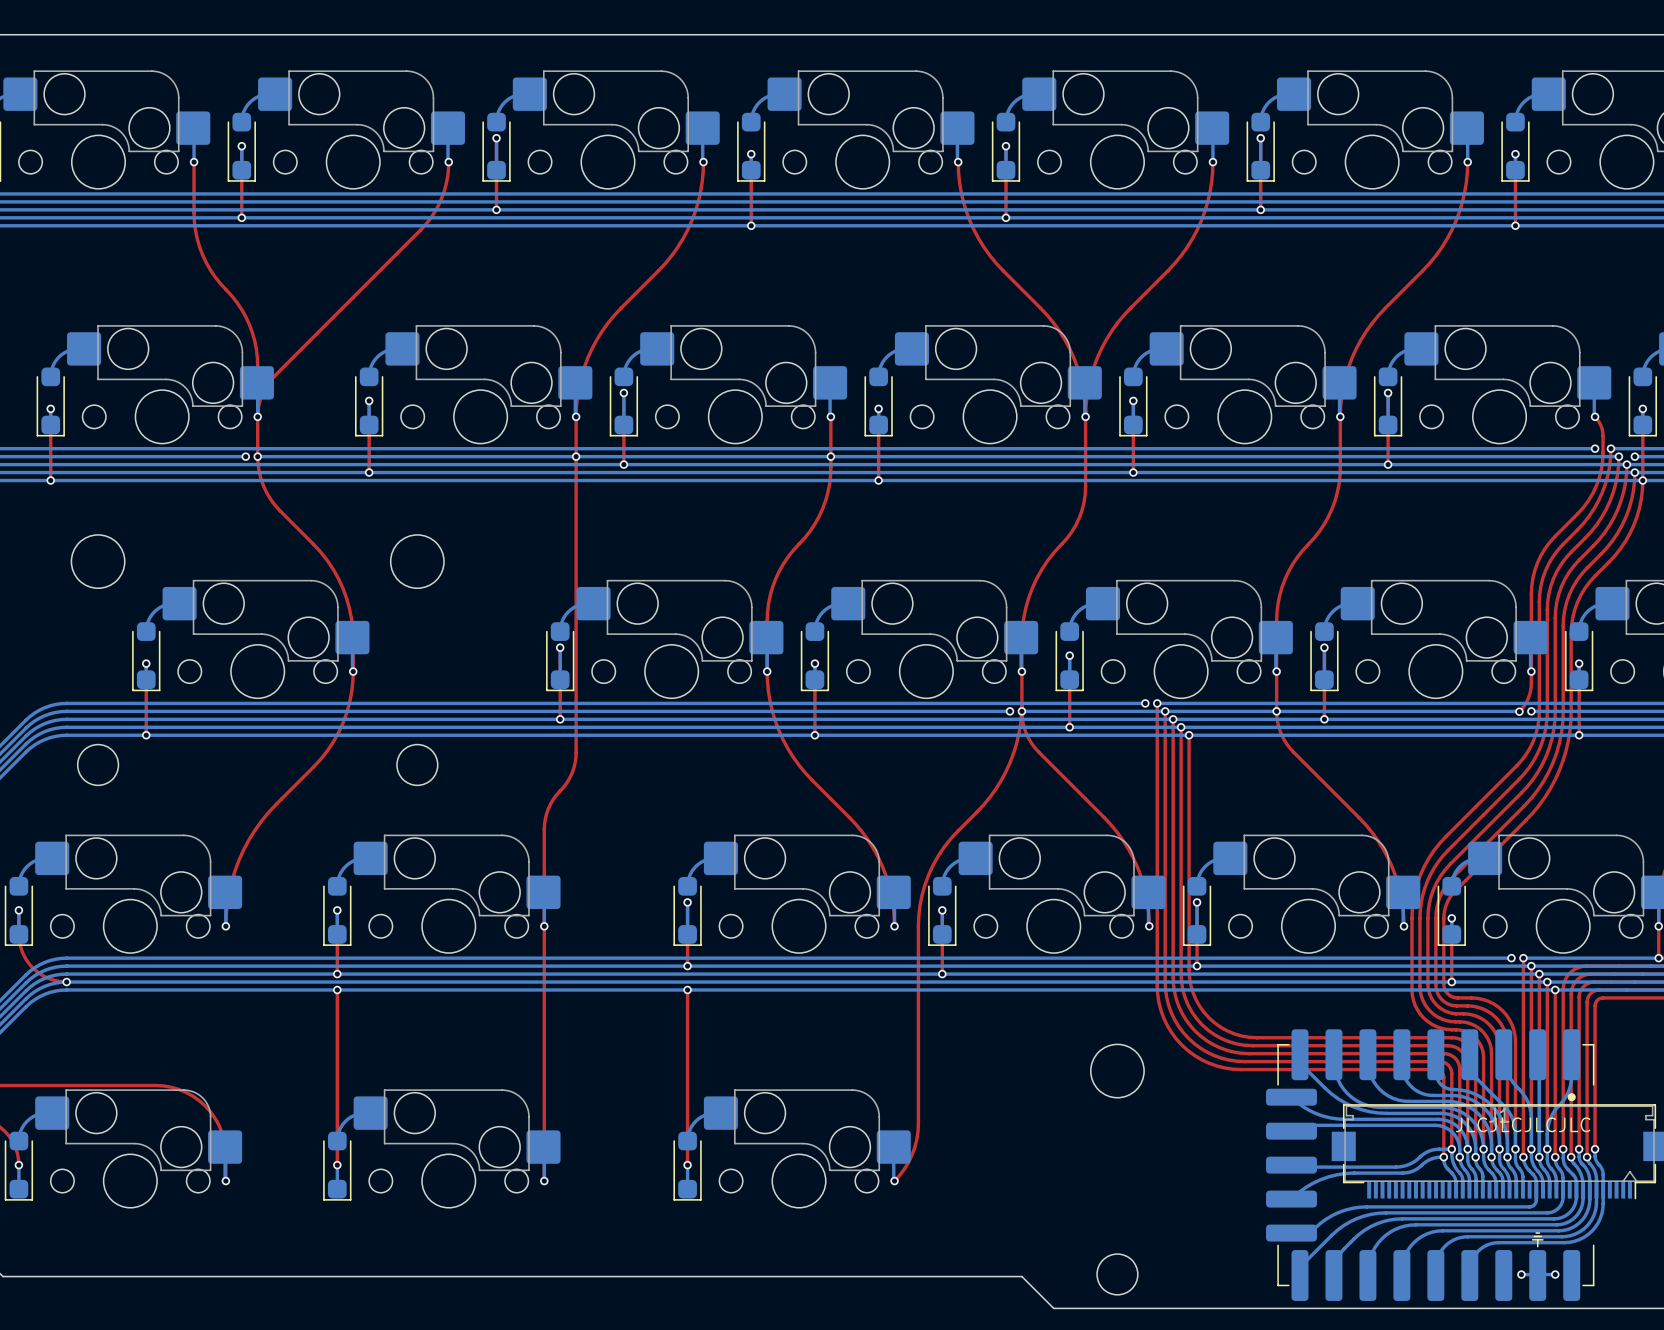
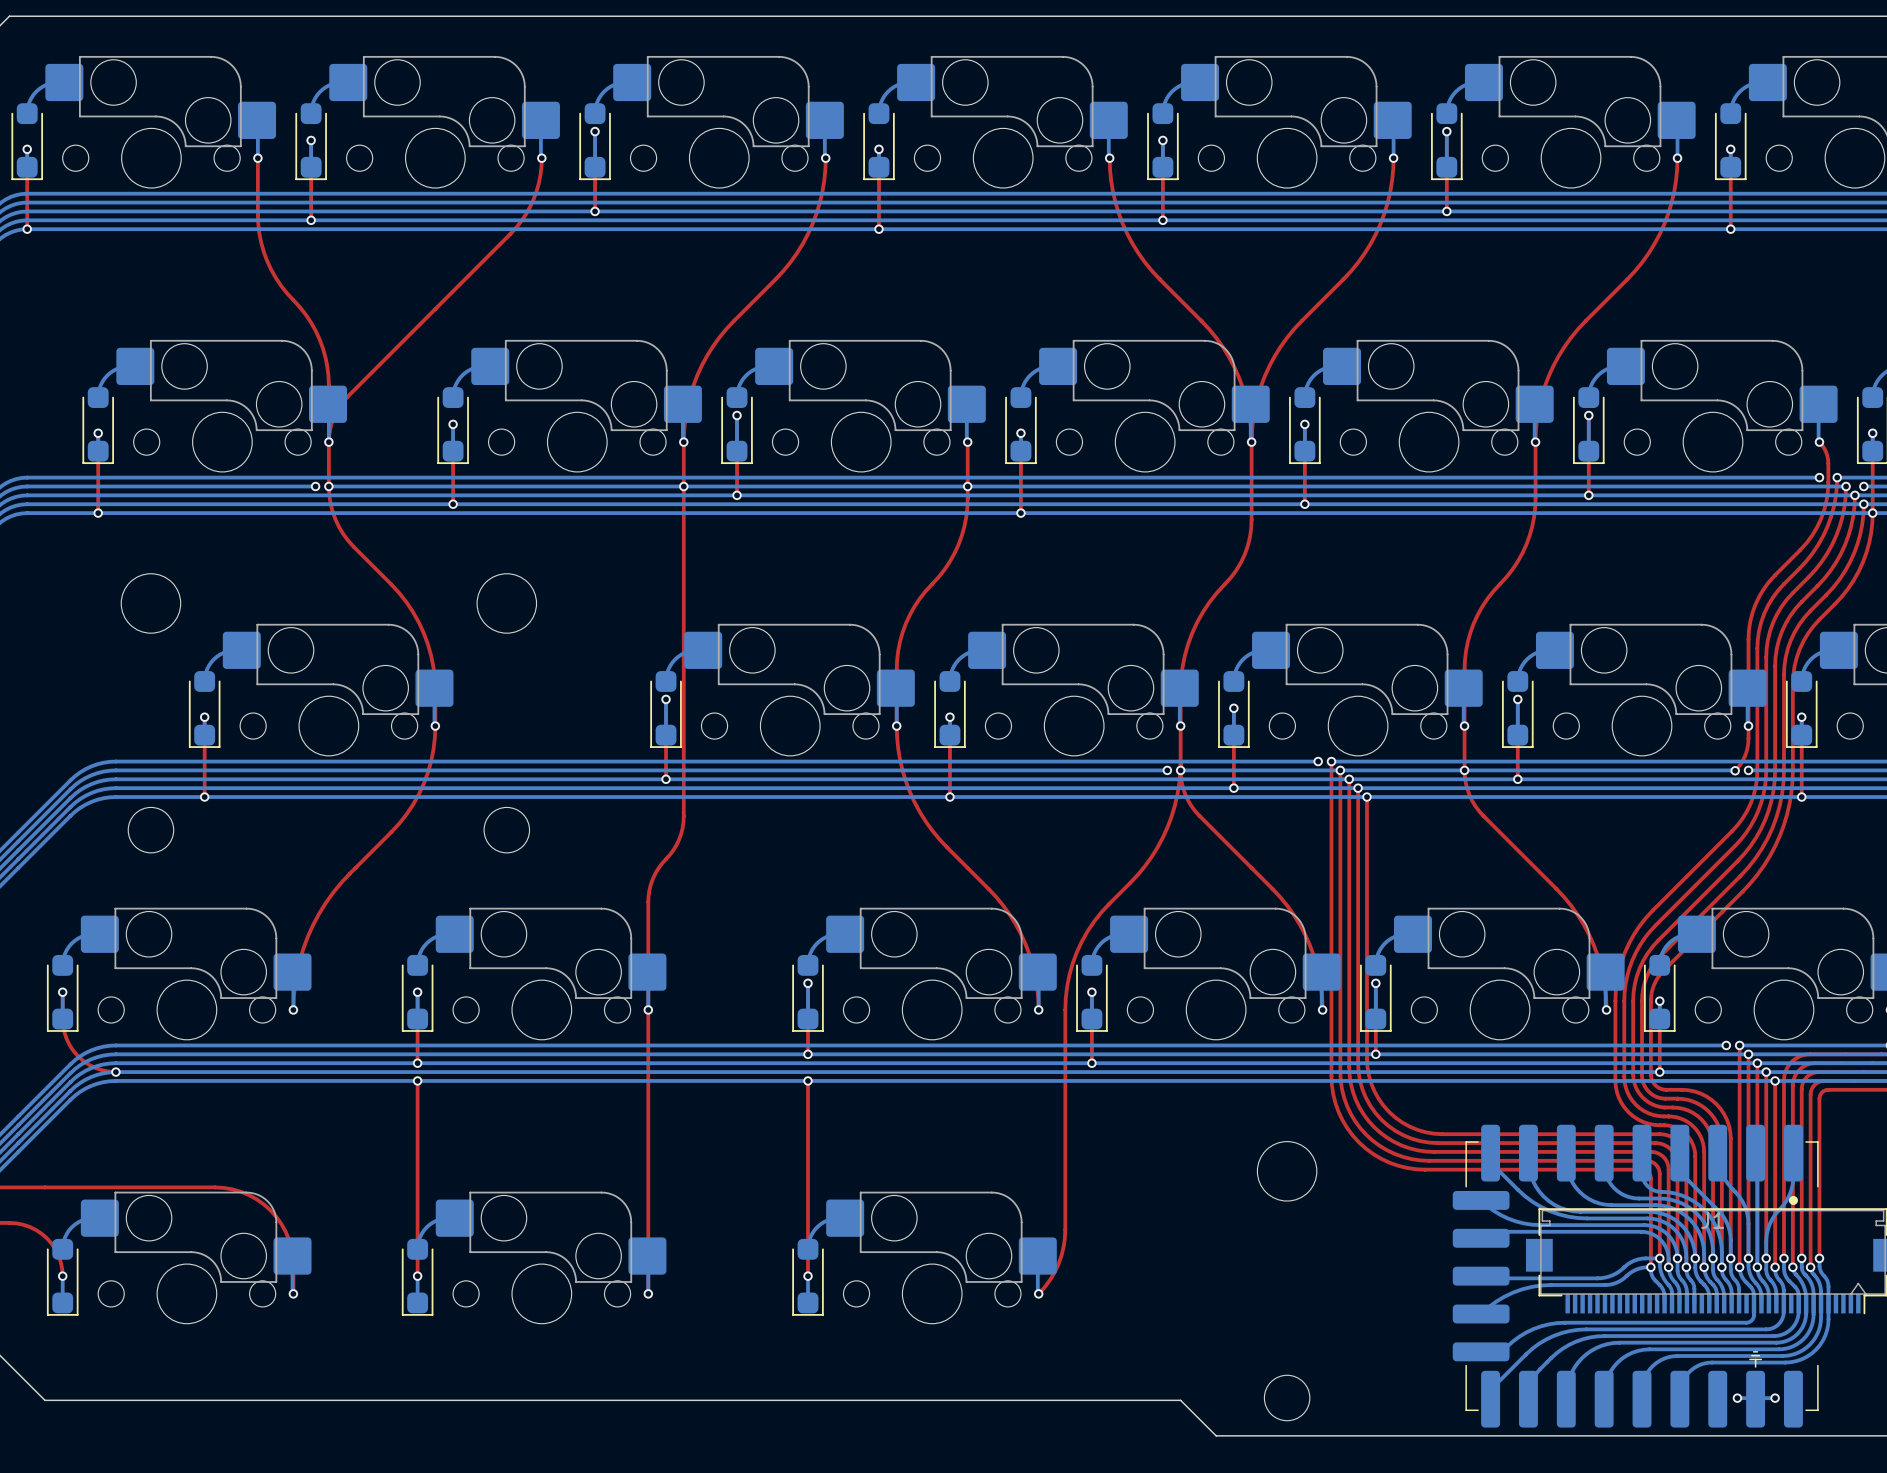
text: JLCJLCJLCJLC (1523, 1124) -> none

